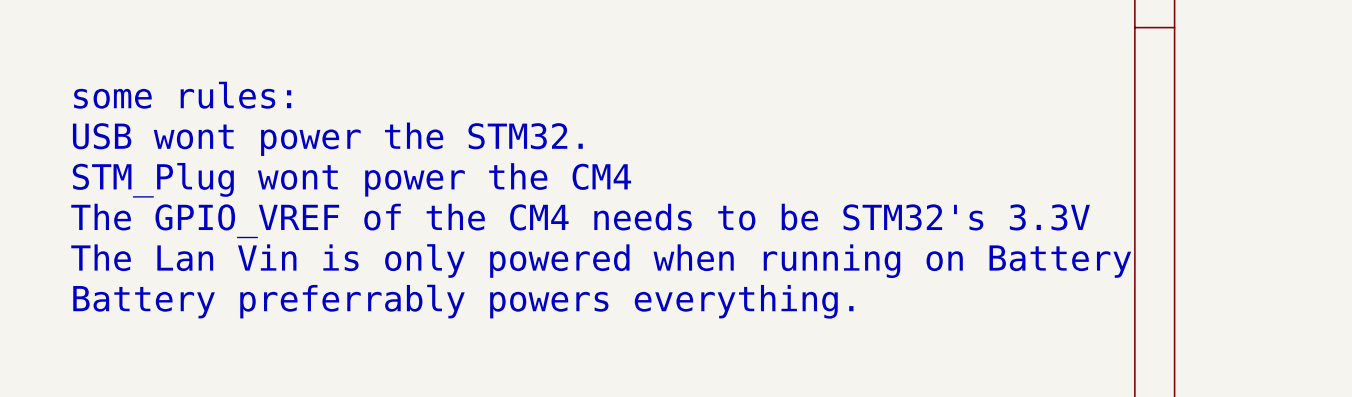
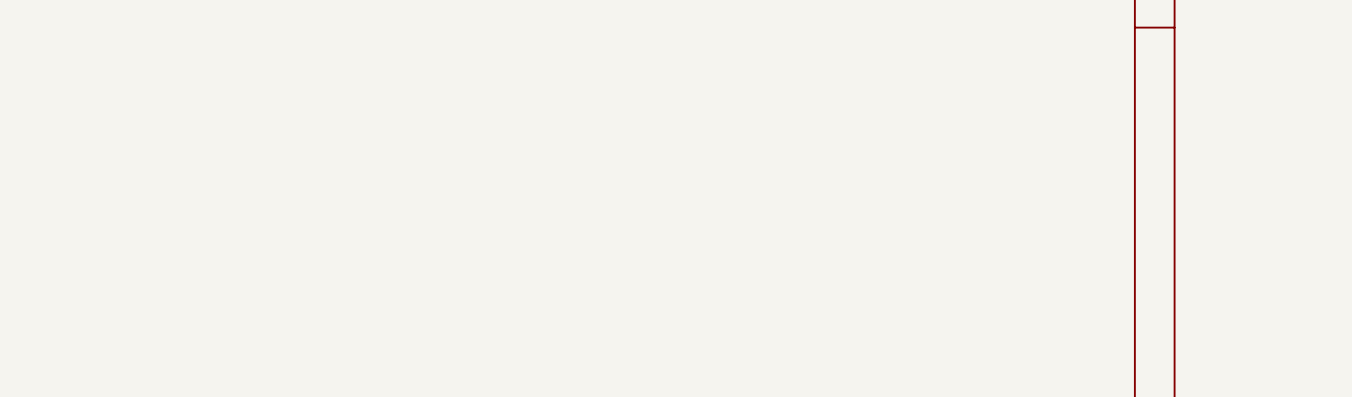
text: some rules: (182, 95) -> none
text: USB wont power the STM32. (327, 139) -> none
text: STM_Plug wont power the CM4 (351, 180) -> none
text: The GPIO_VREF of the CM4 needs to be STM32's 3.3V (580, 220) -> none
text: The Lan Vin is only powered when running on Battery (601, 261) -> none
text: Battery preferrably powers everything. (463, 301) -> none

